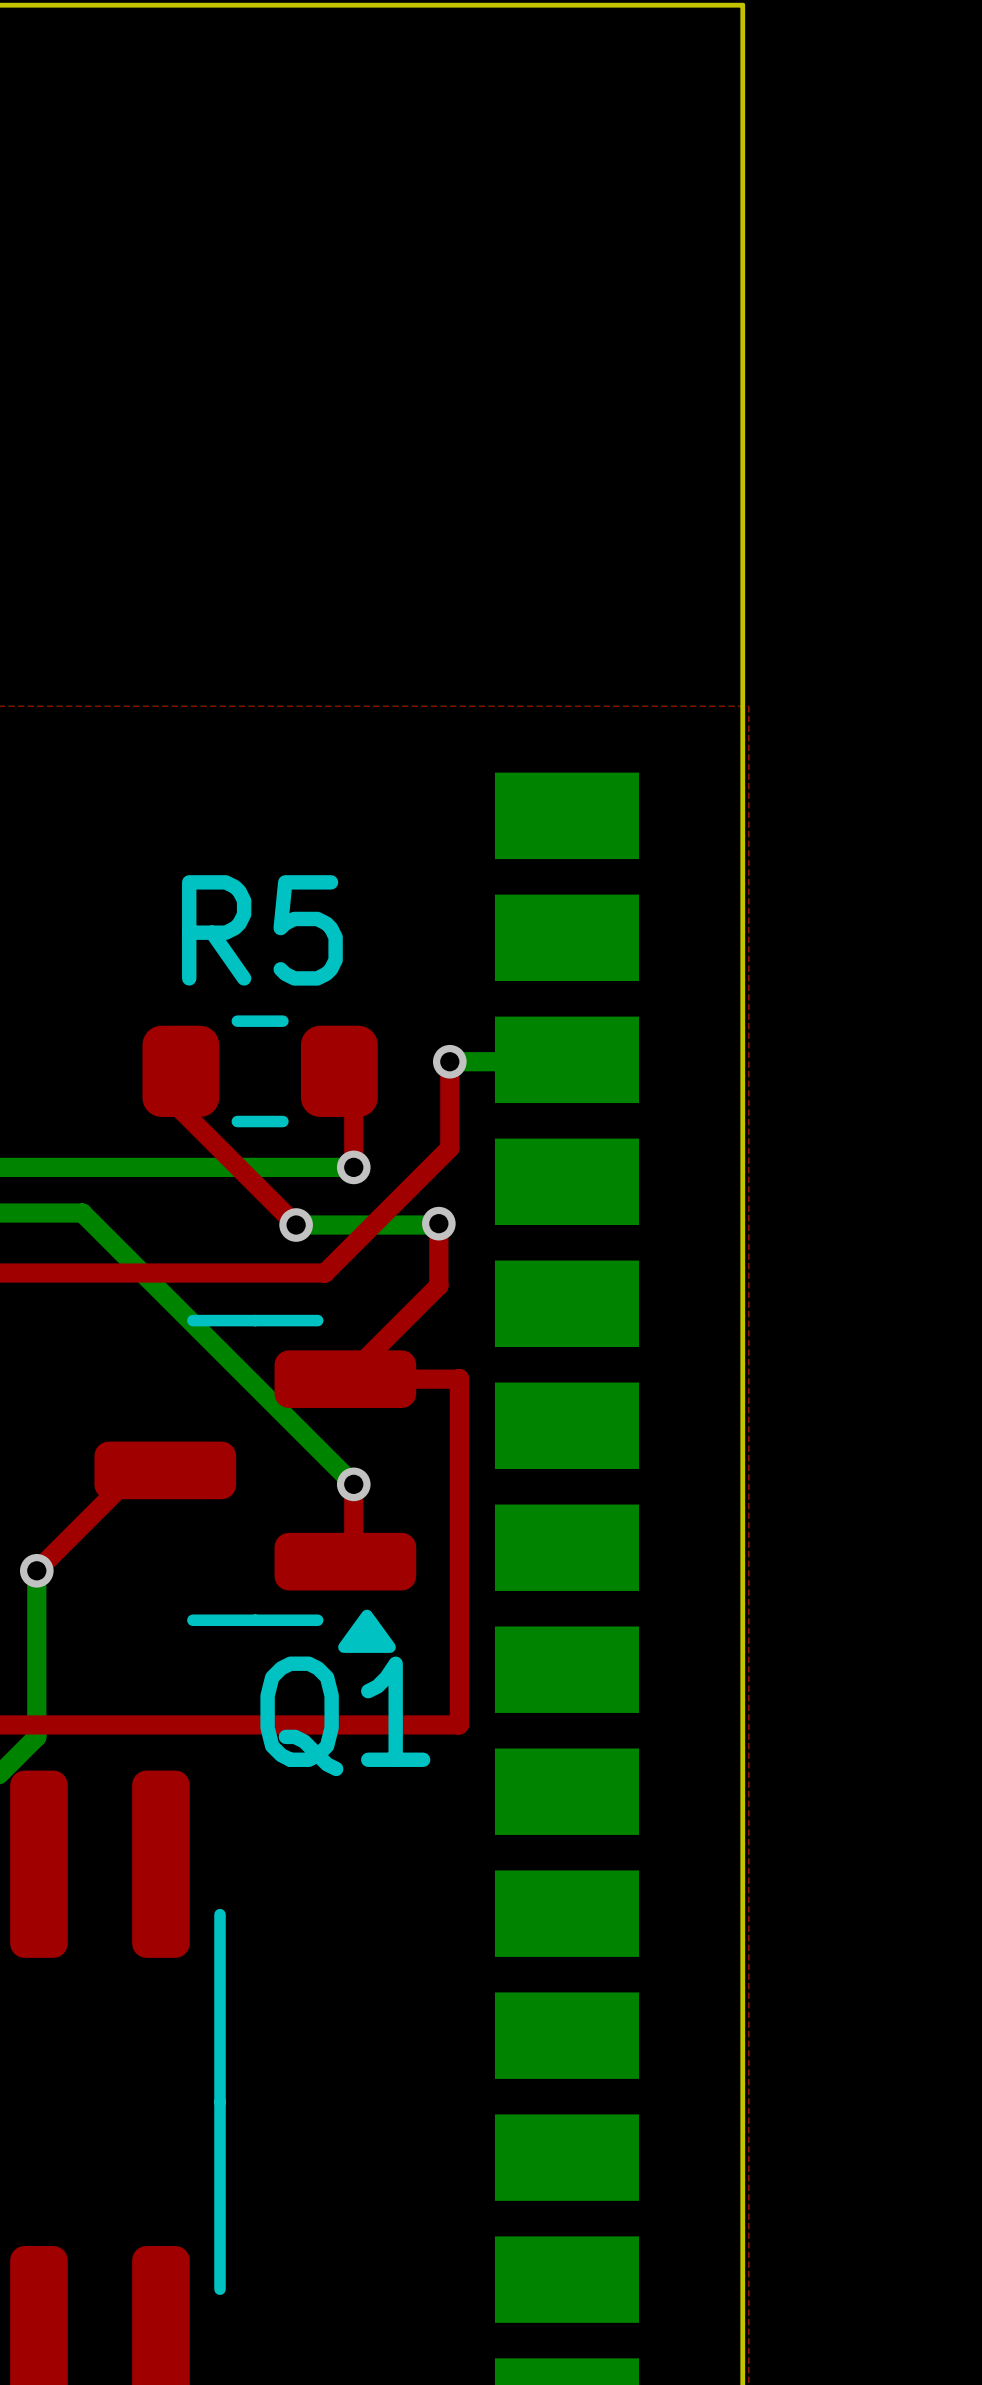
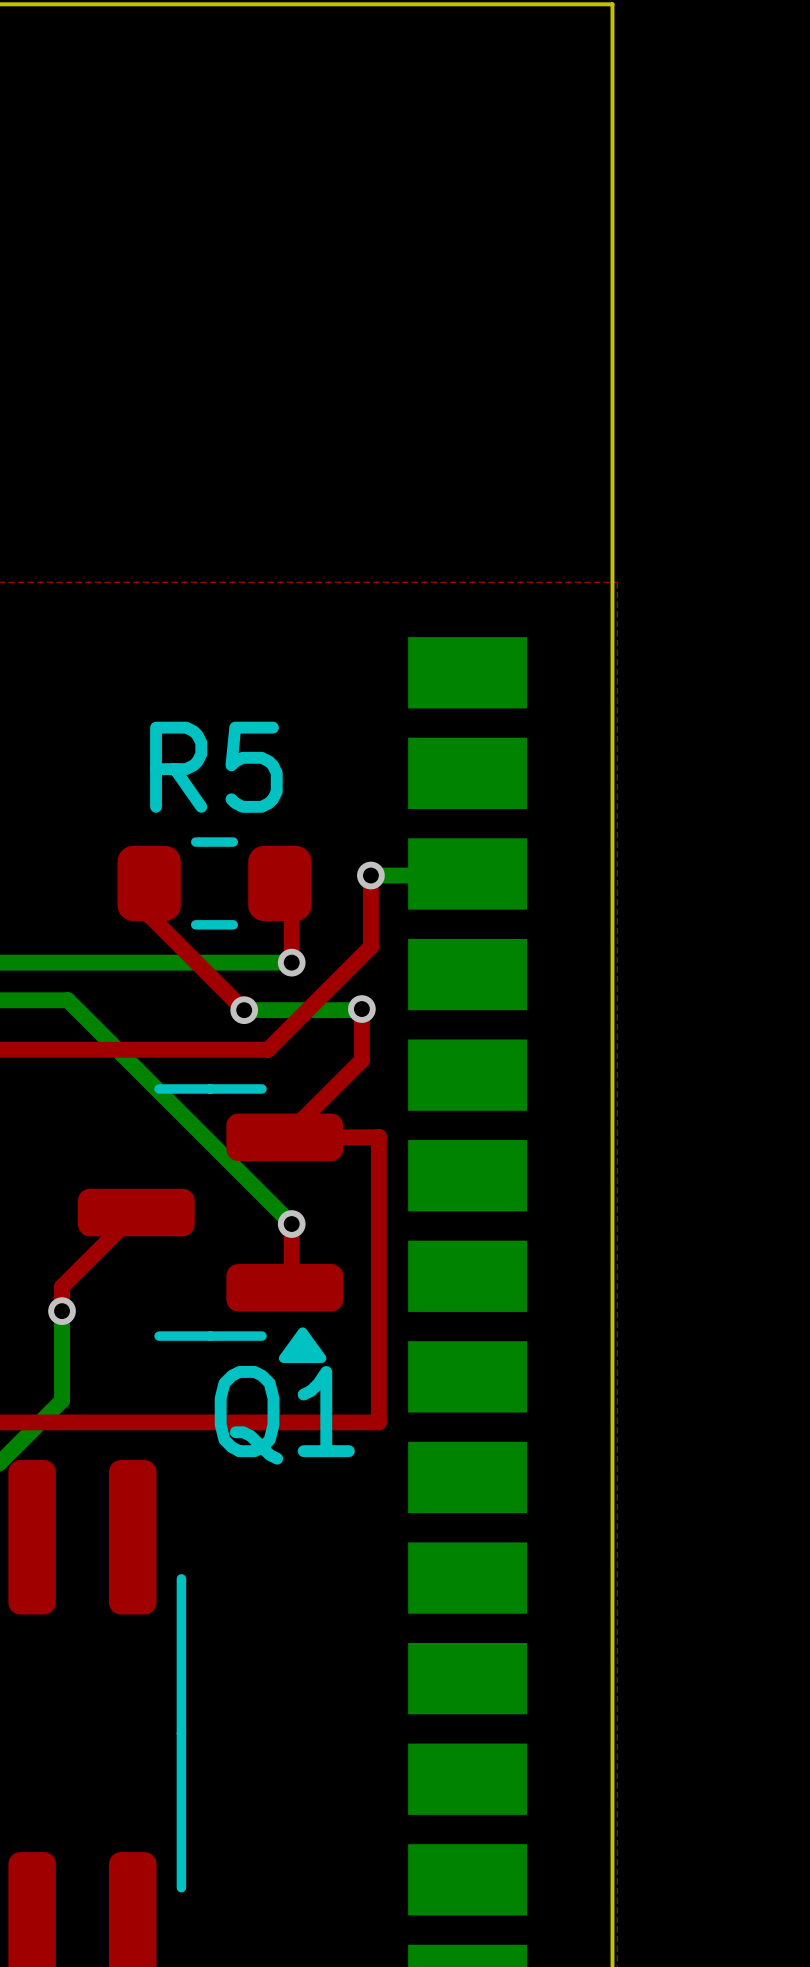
top track: (165, 1470) (137, 1470) (36, 1570) -> (136, 1212) (62, 1286) (62, 1311)
bottom track: (36, 1570) (36, 1736) -> (62, 1311) (62, 1400) (30, 1432)
via position: (36, 1570) -> (62, 1311)

